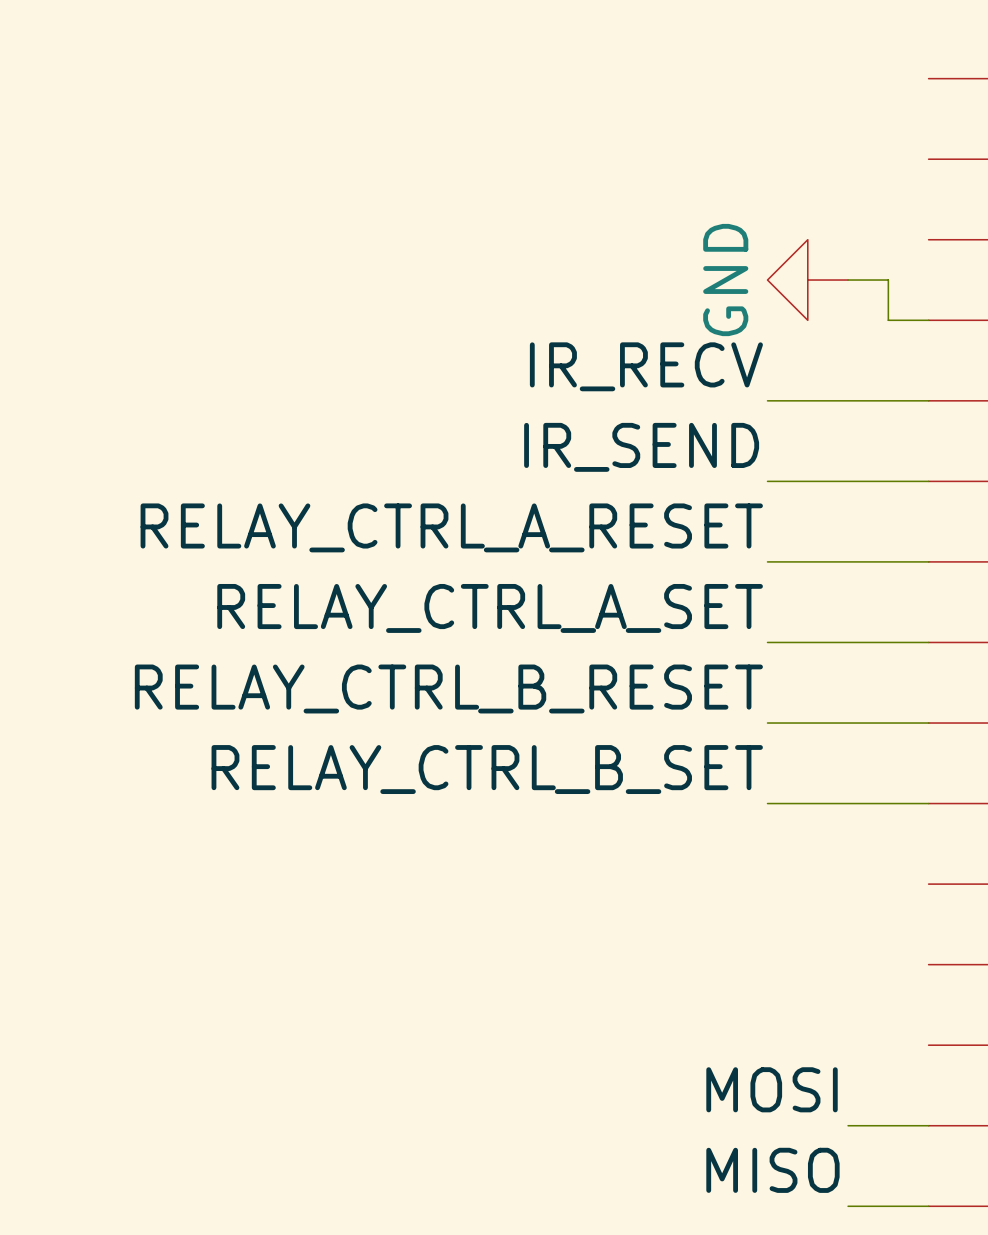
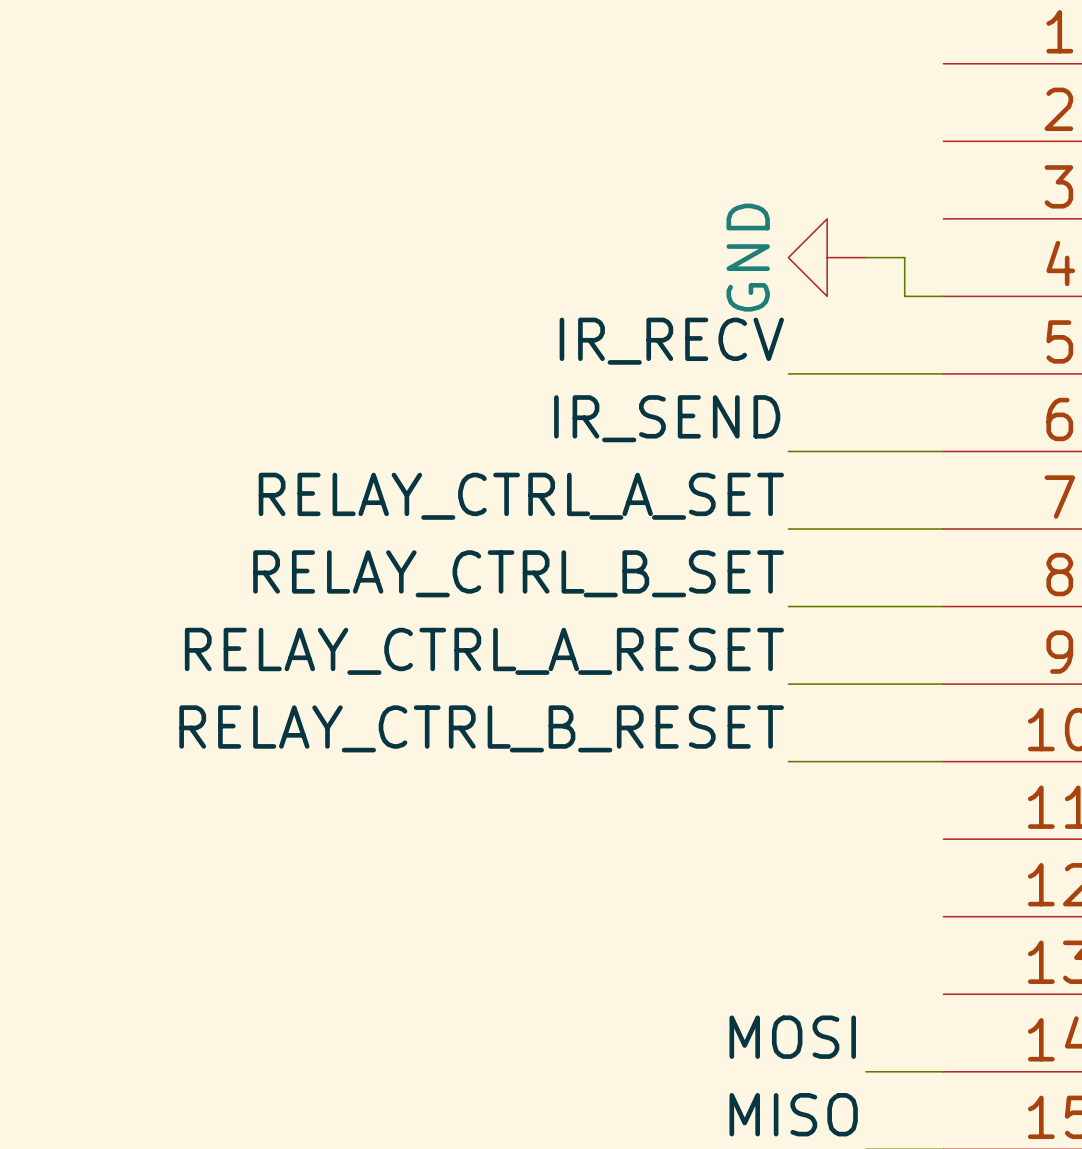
label: RELAY_CTRL_A_RESET (451, 527) -> RELAY_CTRL_A_SET (521, 496)
label: RELAY_CTRL_A_SET (490, 608) -> RELAY_CTRL_B_SET (518, 573)
label: RELAY_CTRL_B_RESET (448, 688) -> RELAY_CTRL_A_RESET (484, 651)
label: RELAY_CTRL_B_SET (487, 769) -> RELAY_CTRL_B_RESET (481, 728)

